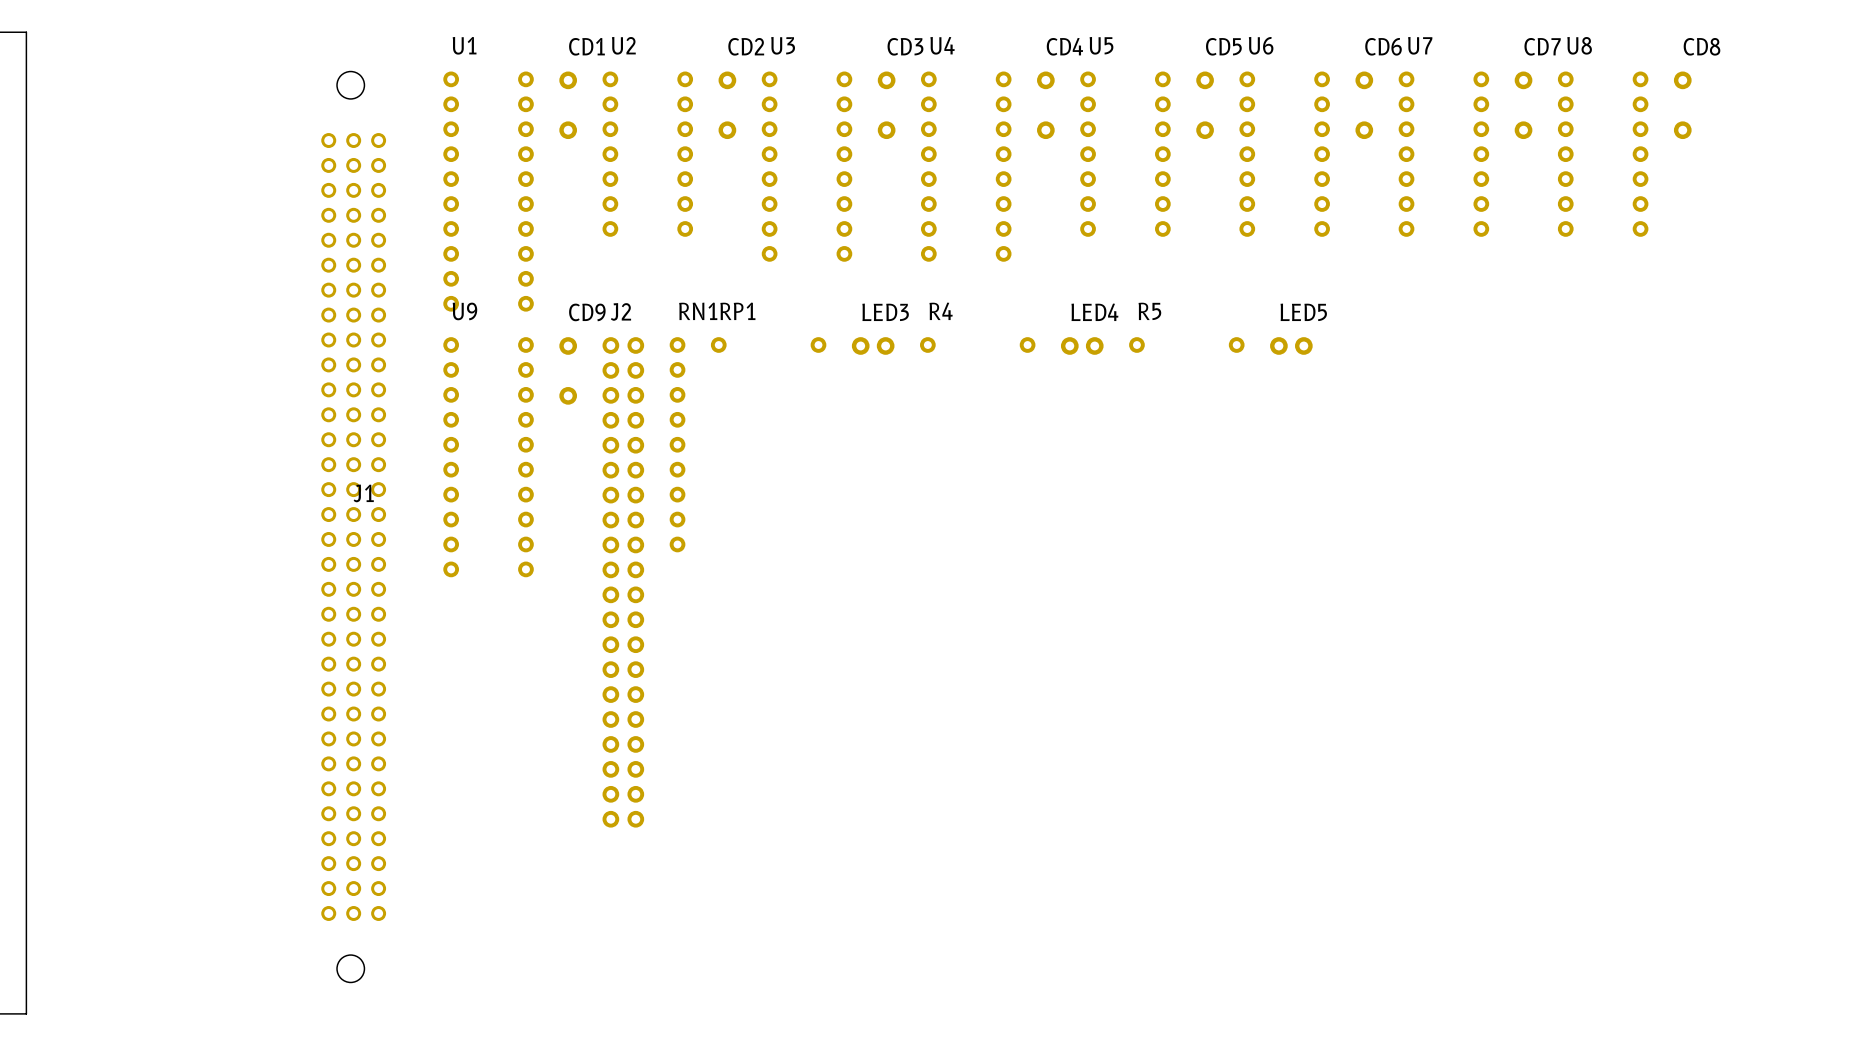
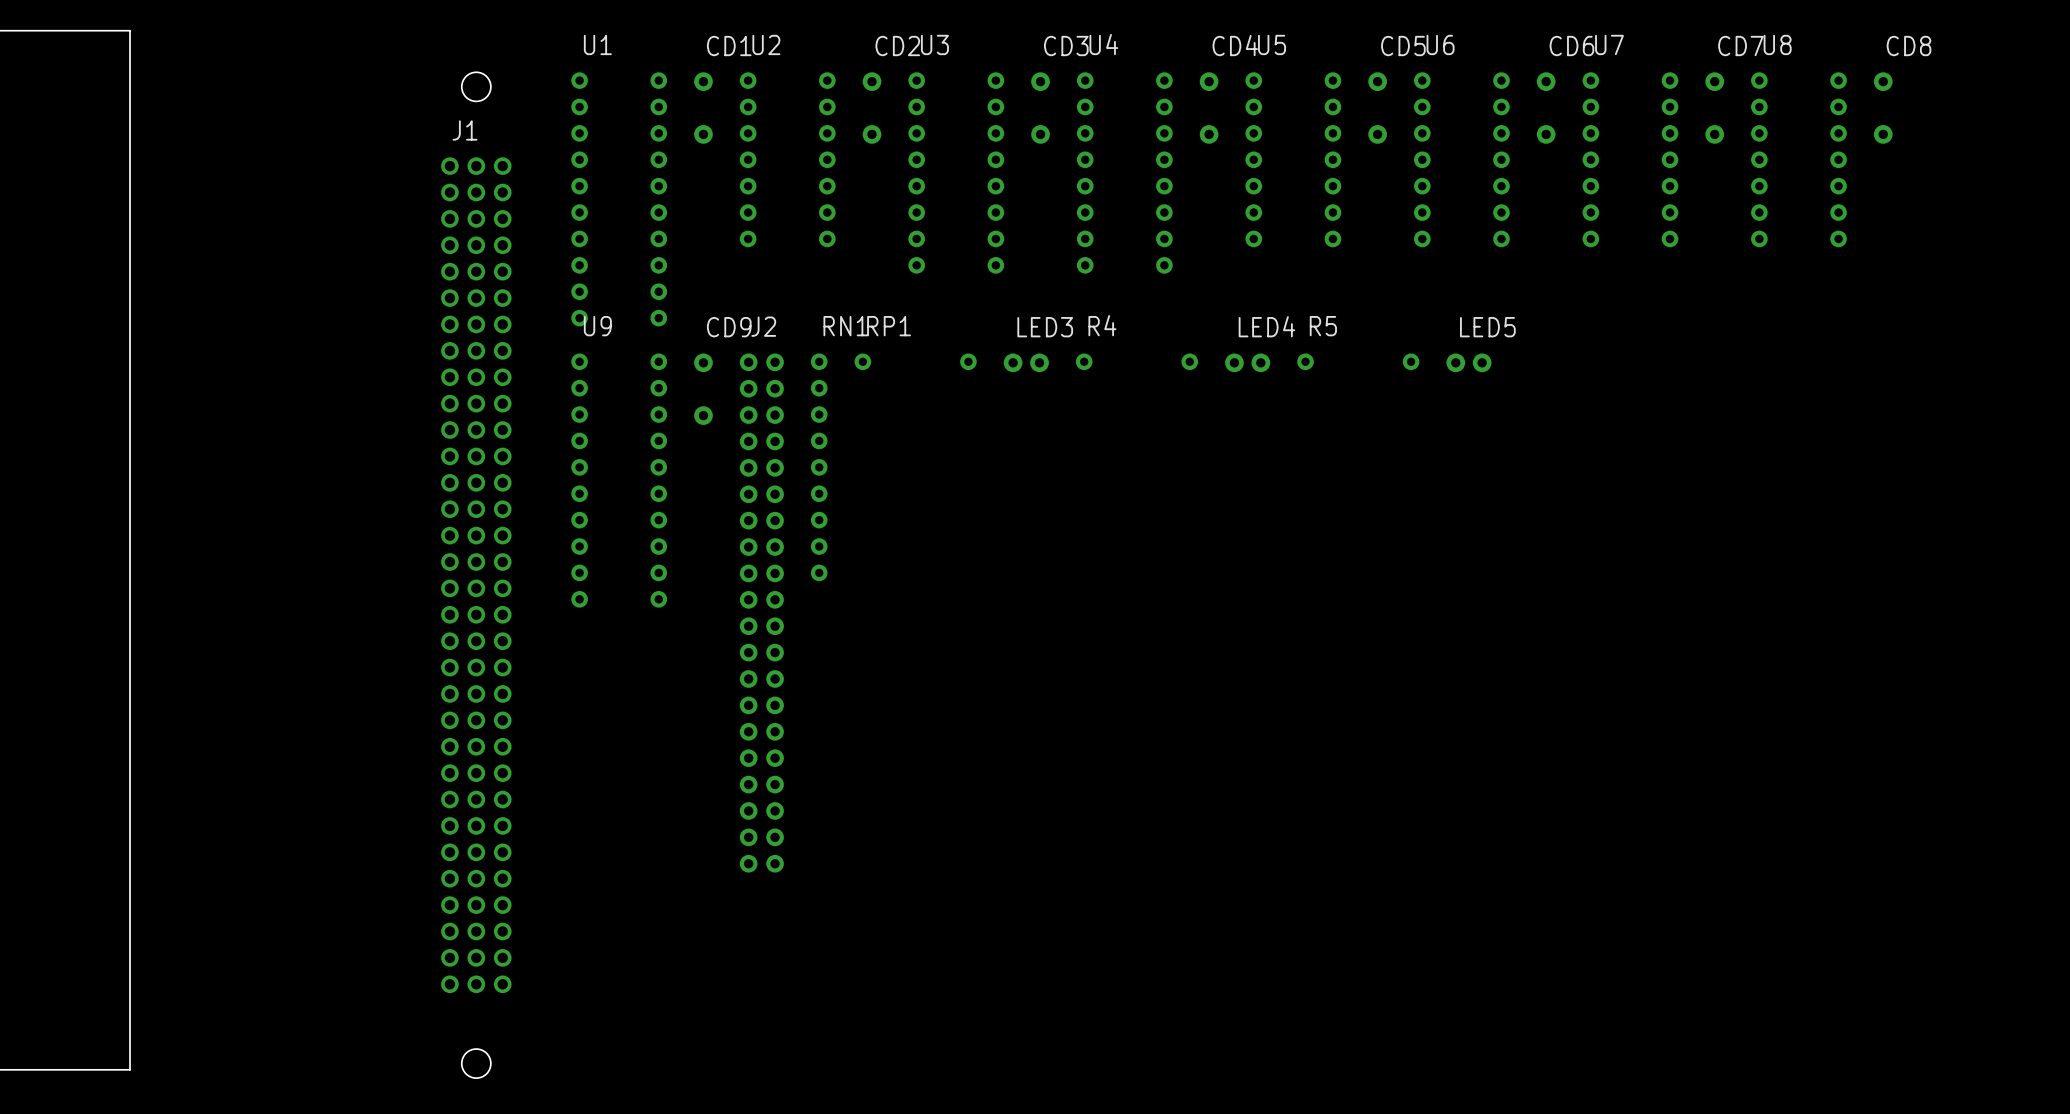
J1 footprint: [321, 71, 387, 983] -> [441, 72, 512, 1079]
J1 name position: J1 (363, 493) -> J1 (465, 130)

